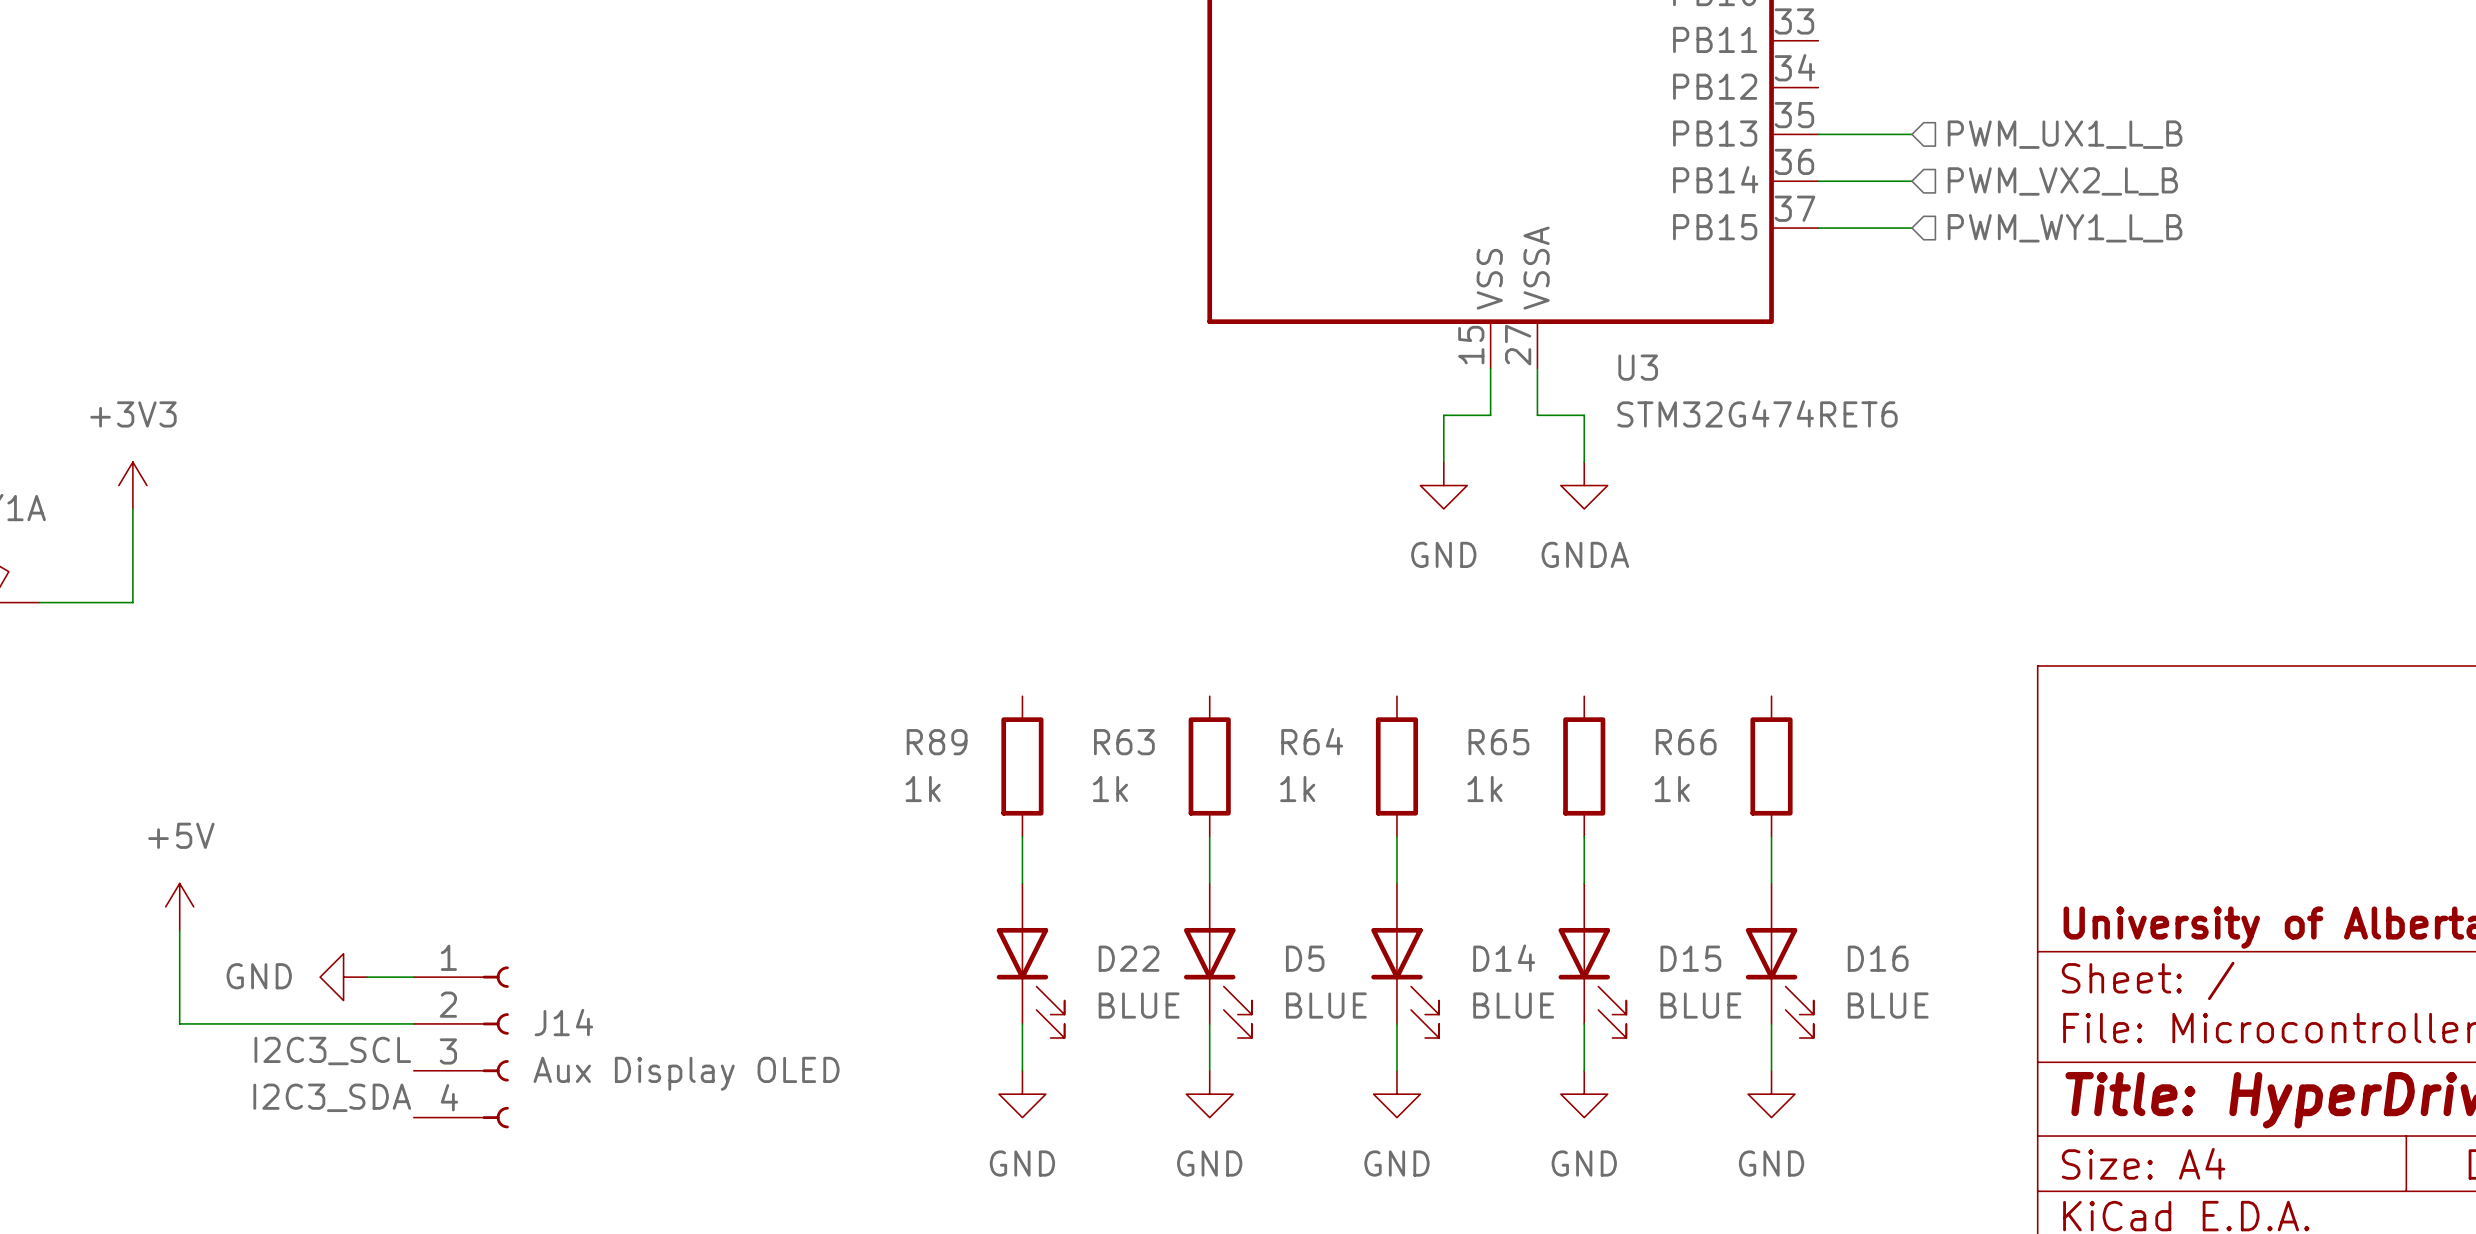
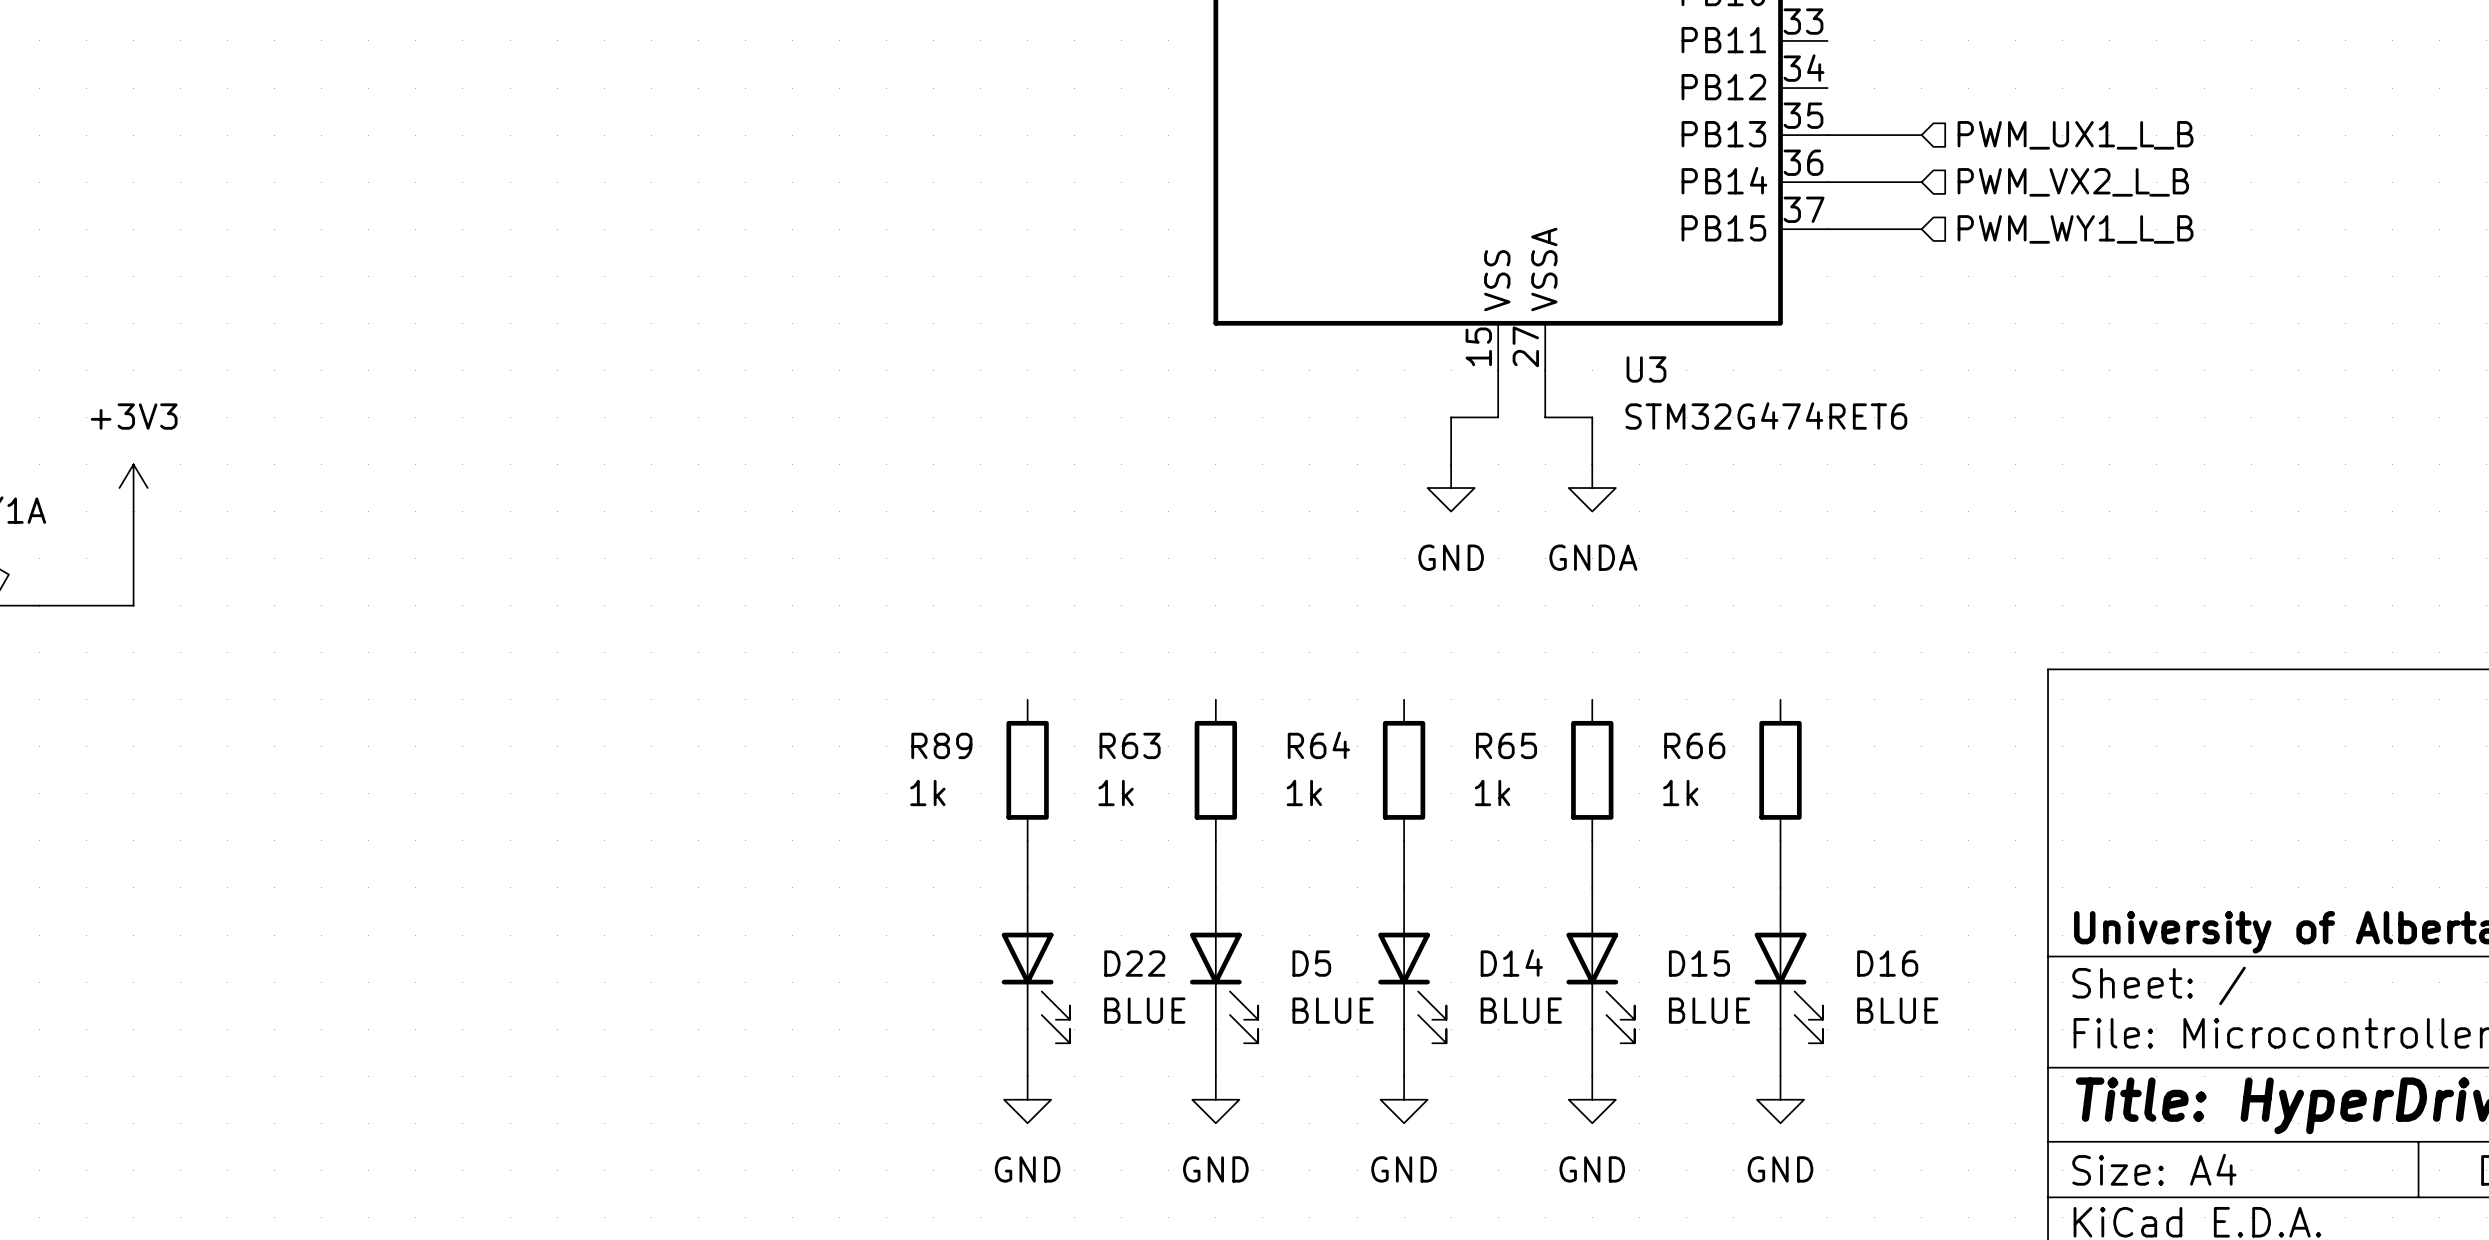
power symbol: +5V (179, 906) -> none
wire: (179, 930) (179, 1023) (413, 1023) -> none
power symbol: GND (343, 977) -> none
wire: (366, 977) (413, 977) -> none
J14: Aux Display OLED (461, 1047) -> none
label: I2C3_SCL (332, 1050) -> none
label: I2C3_SDA (332, 1097) -> none

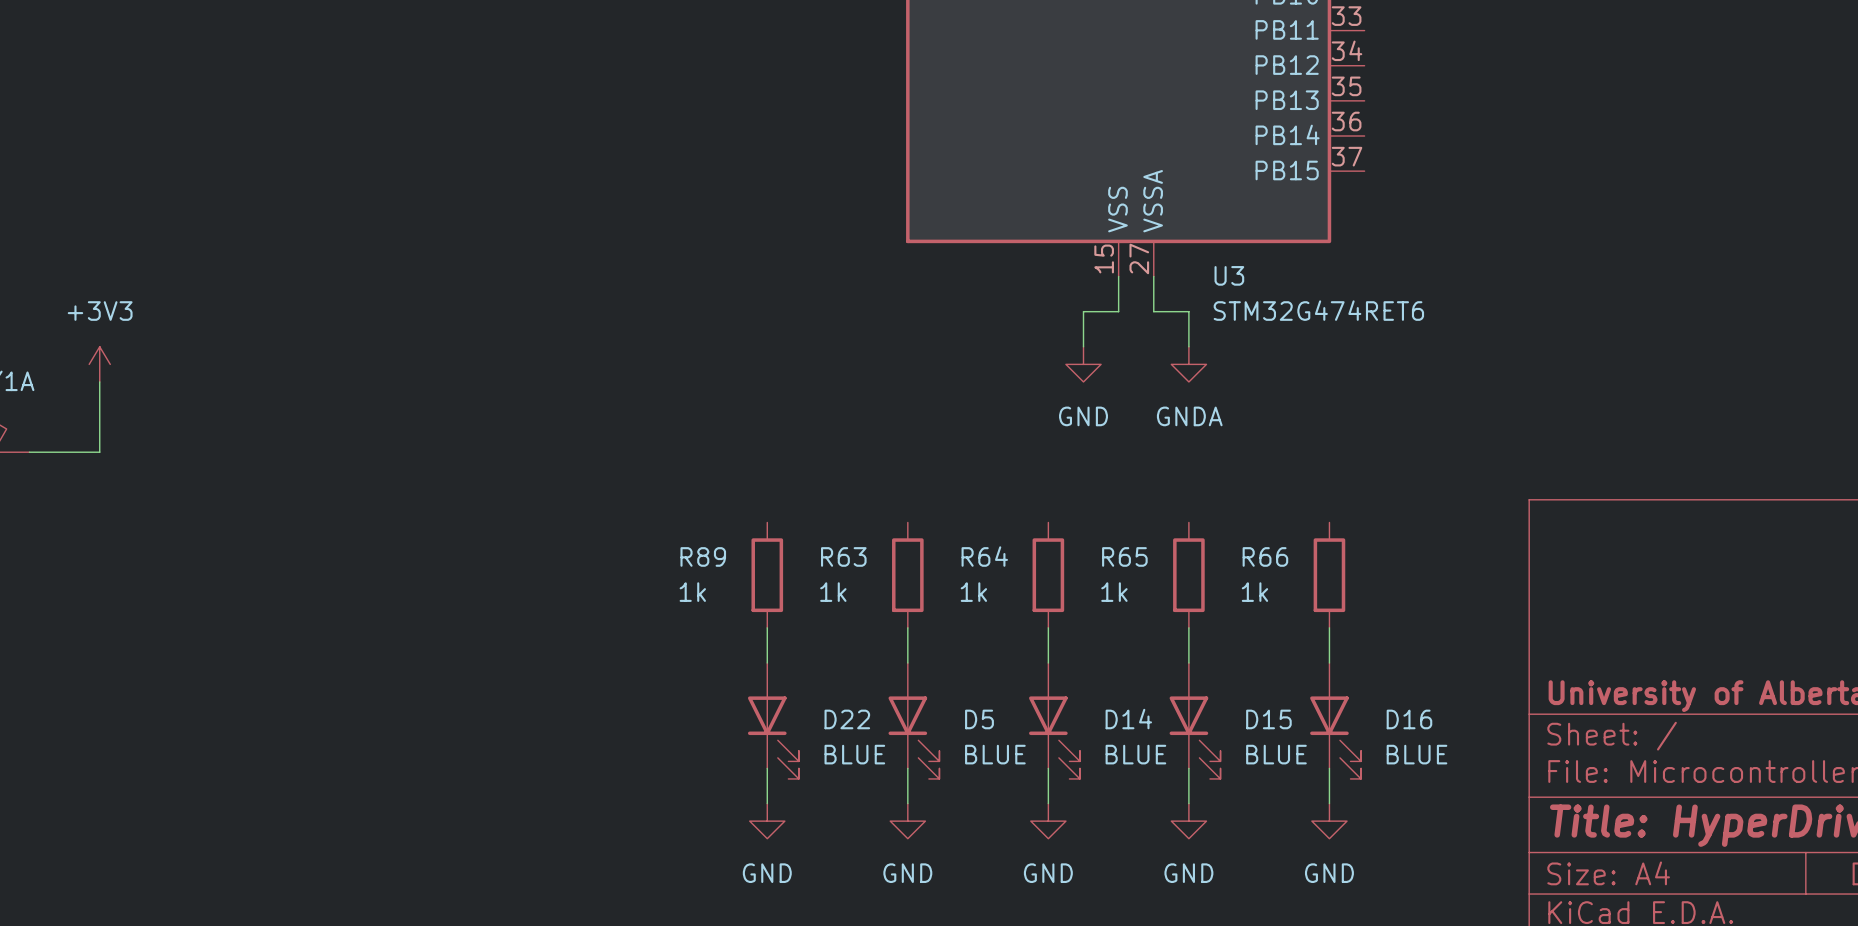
wire: (1827, 135) (1921, 135) -> none
hierarchical label: PWM_UX1_L_B (2075, 135) -> none
wire: (1827, 182) (1921, 182) -> none
hierarchical label: PWM_VX2_L_B (2073, 182) -> none
wire: (1827, 229) (1921, 229) -> none
hierarchical label: PWM_WY1_L_B (2075, 229) -> none

